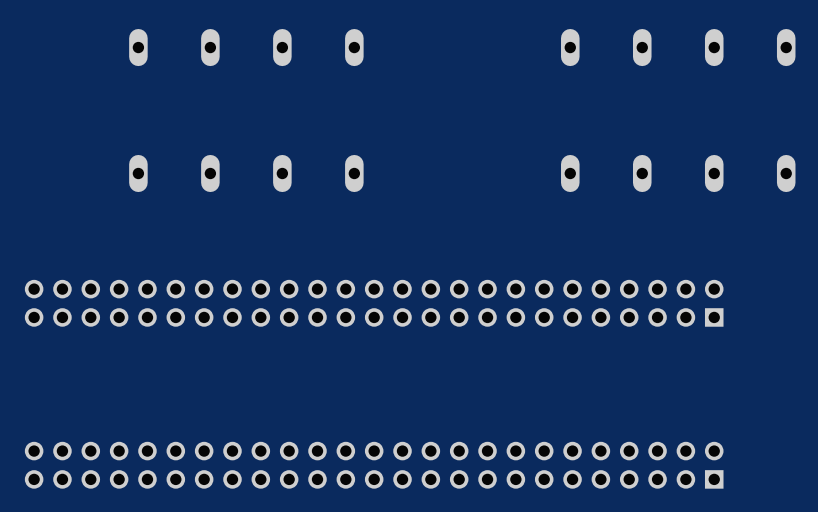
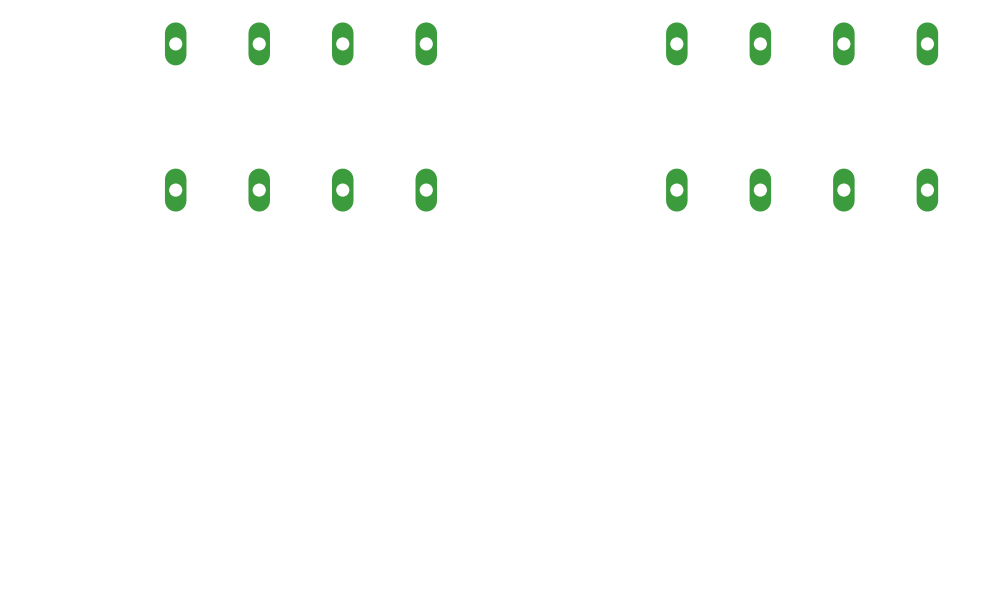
part: (374, 303) -> none
part: (374, 465) -> none

